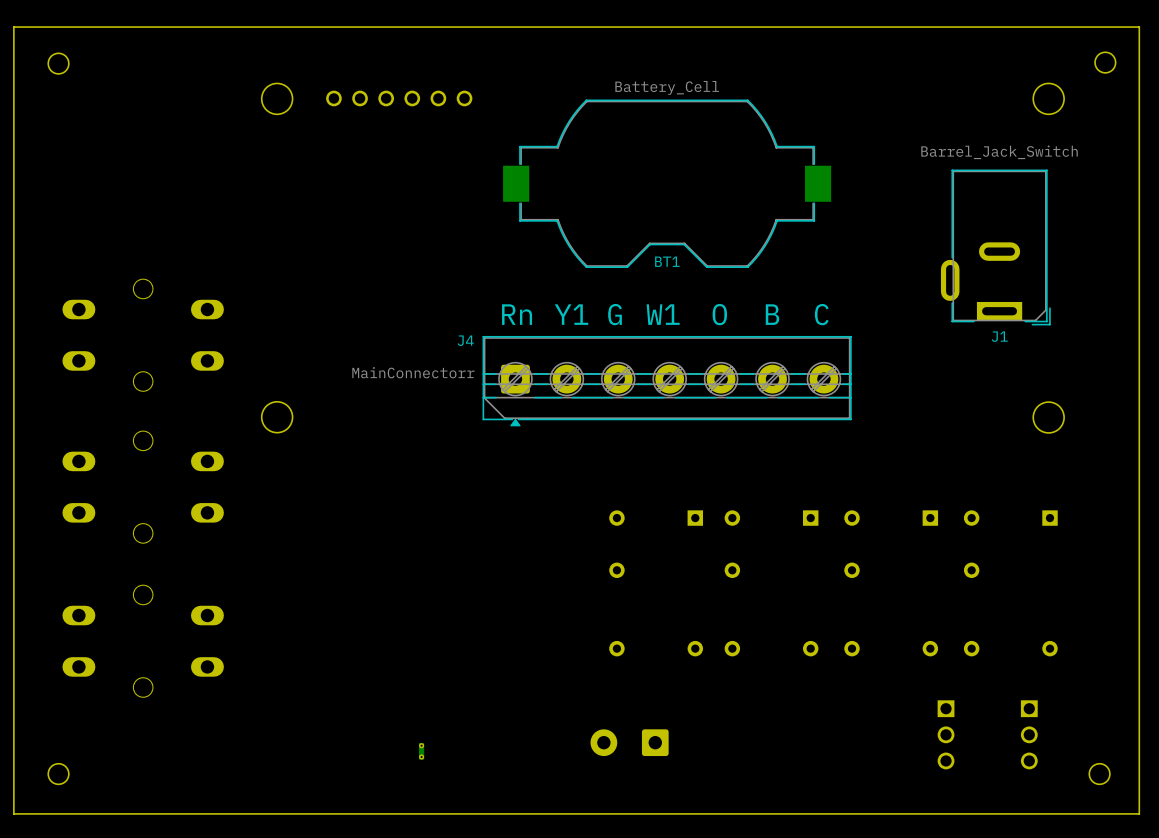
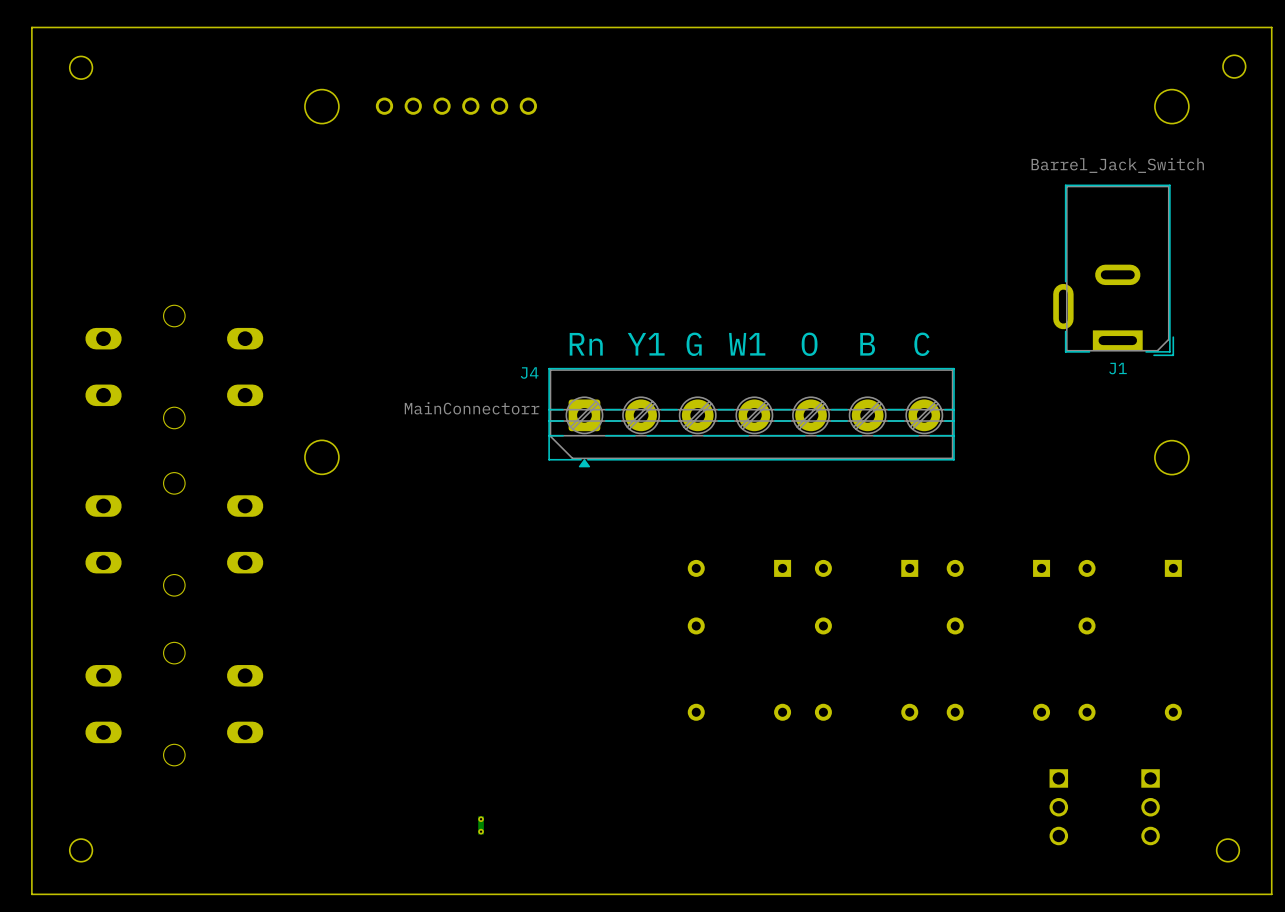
BT1: Battery_Cell (667, 183) -> none
part: (629, 742) -> none

